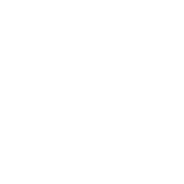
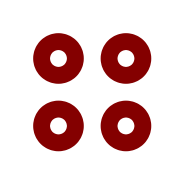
part: none -> (58, 58)
part: none -> (125, 58)
part: none -> (58, 125)
part: none -> (125, 125)

